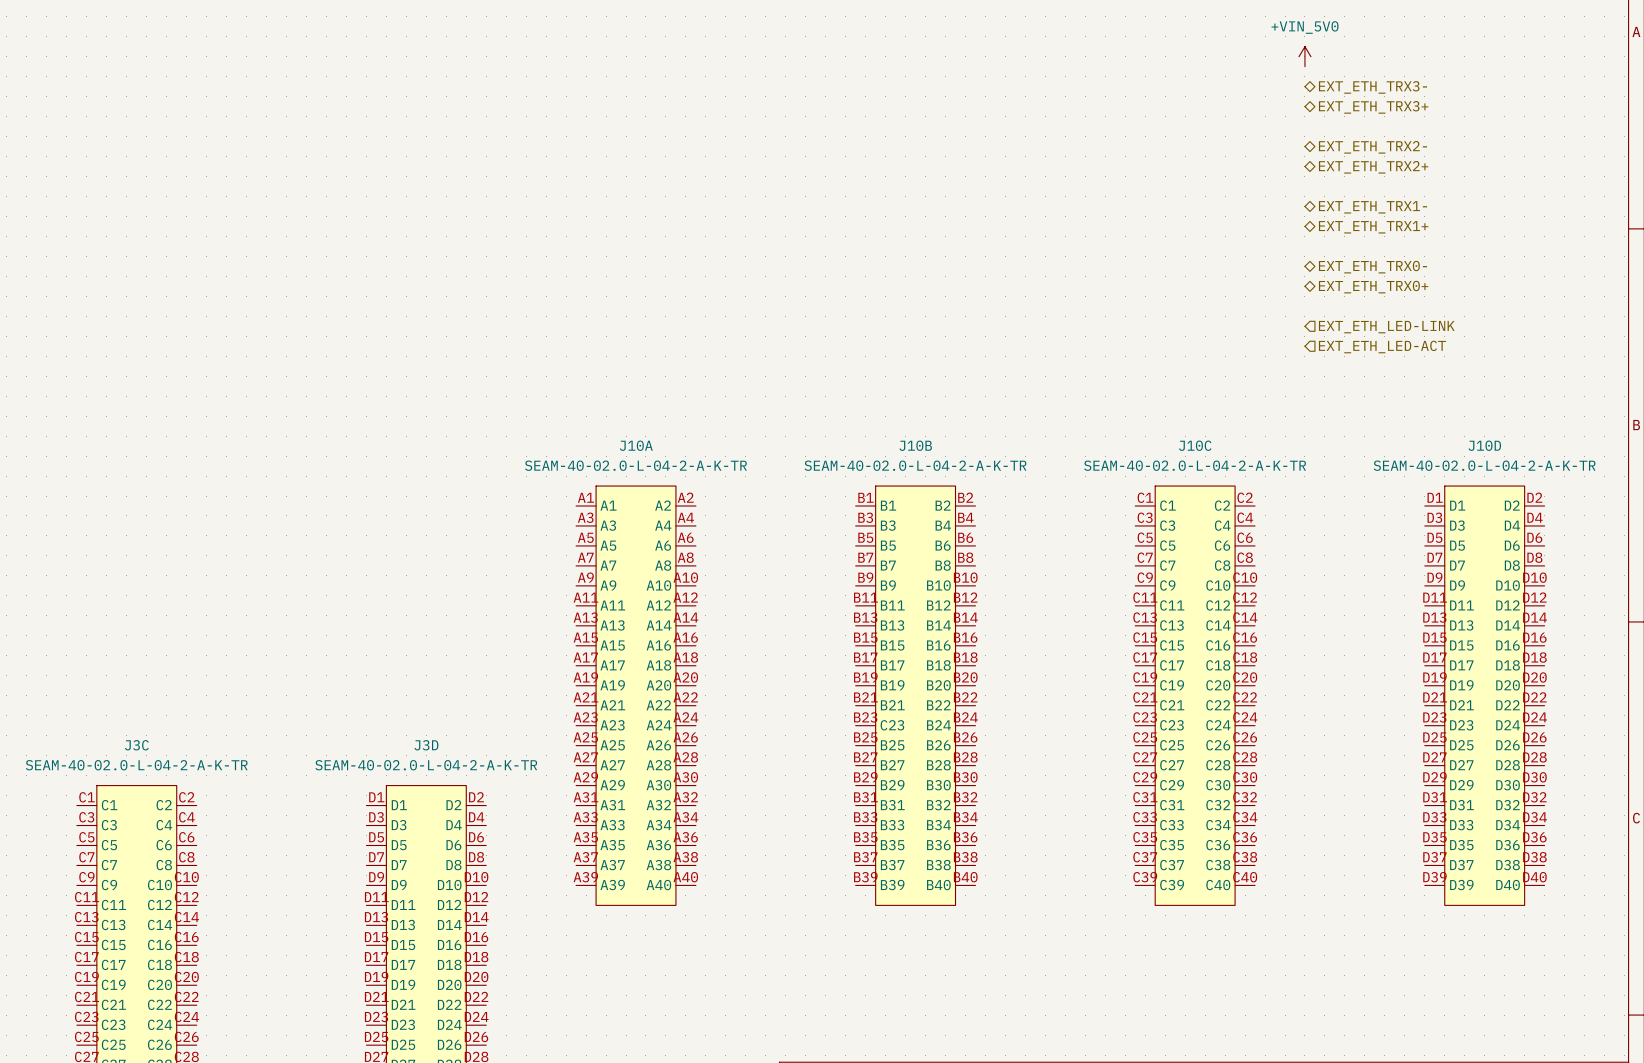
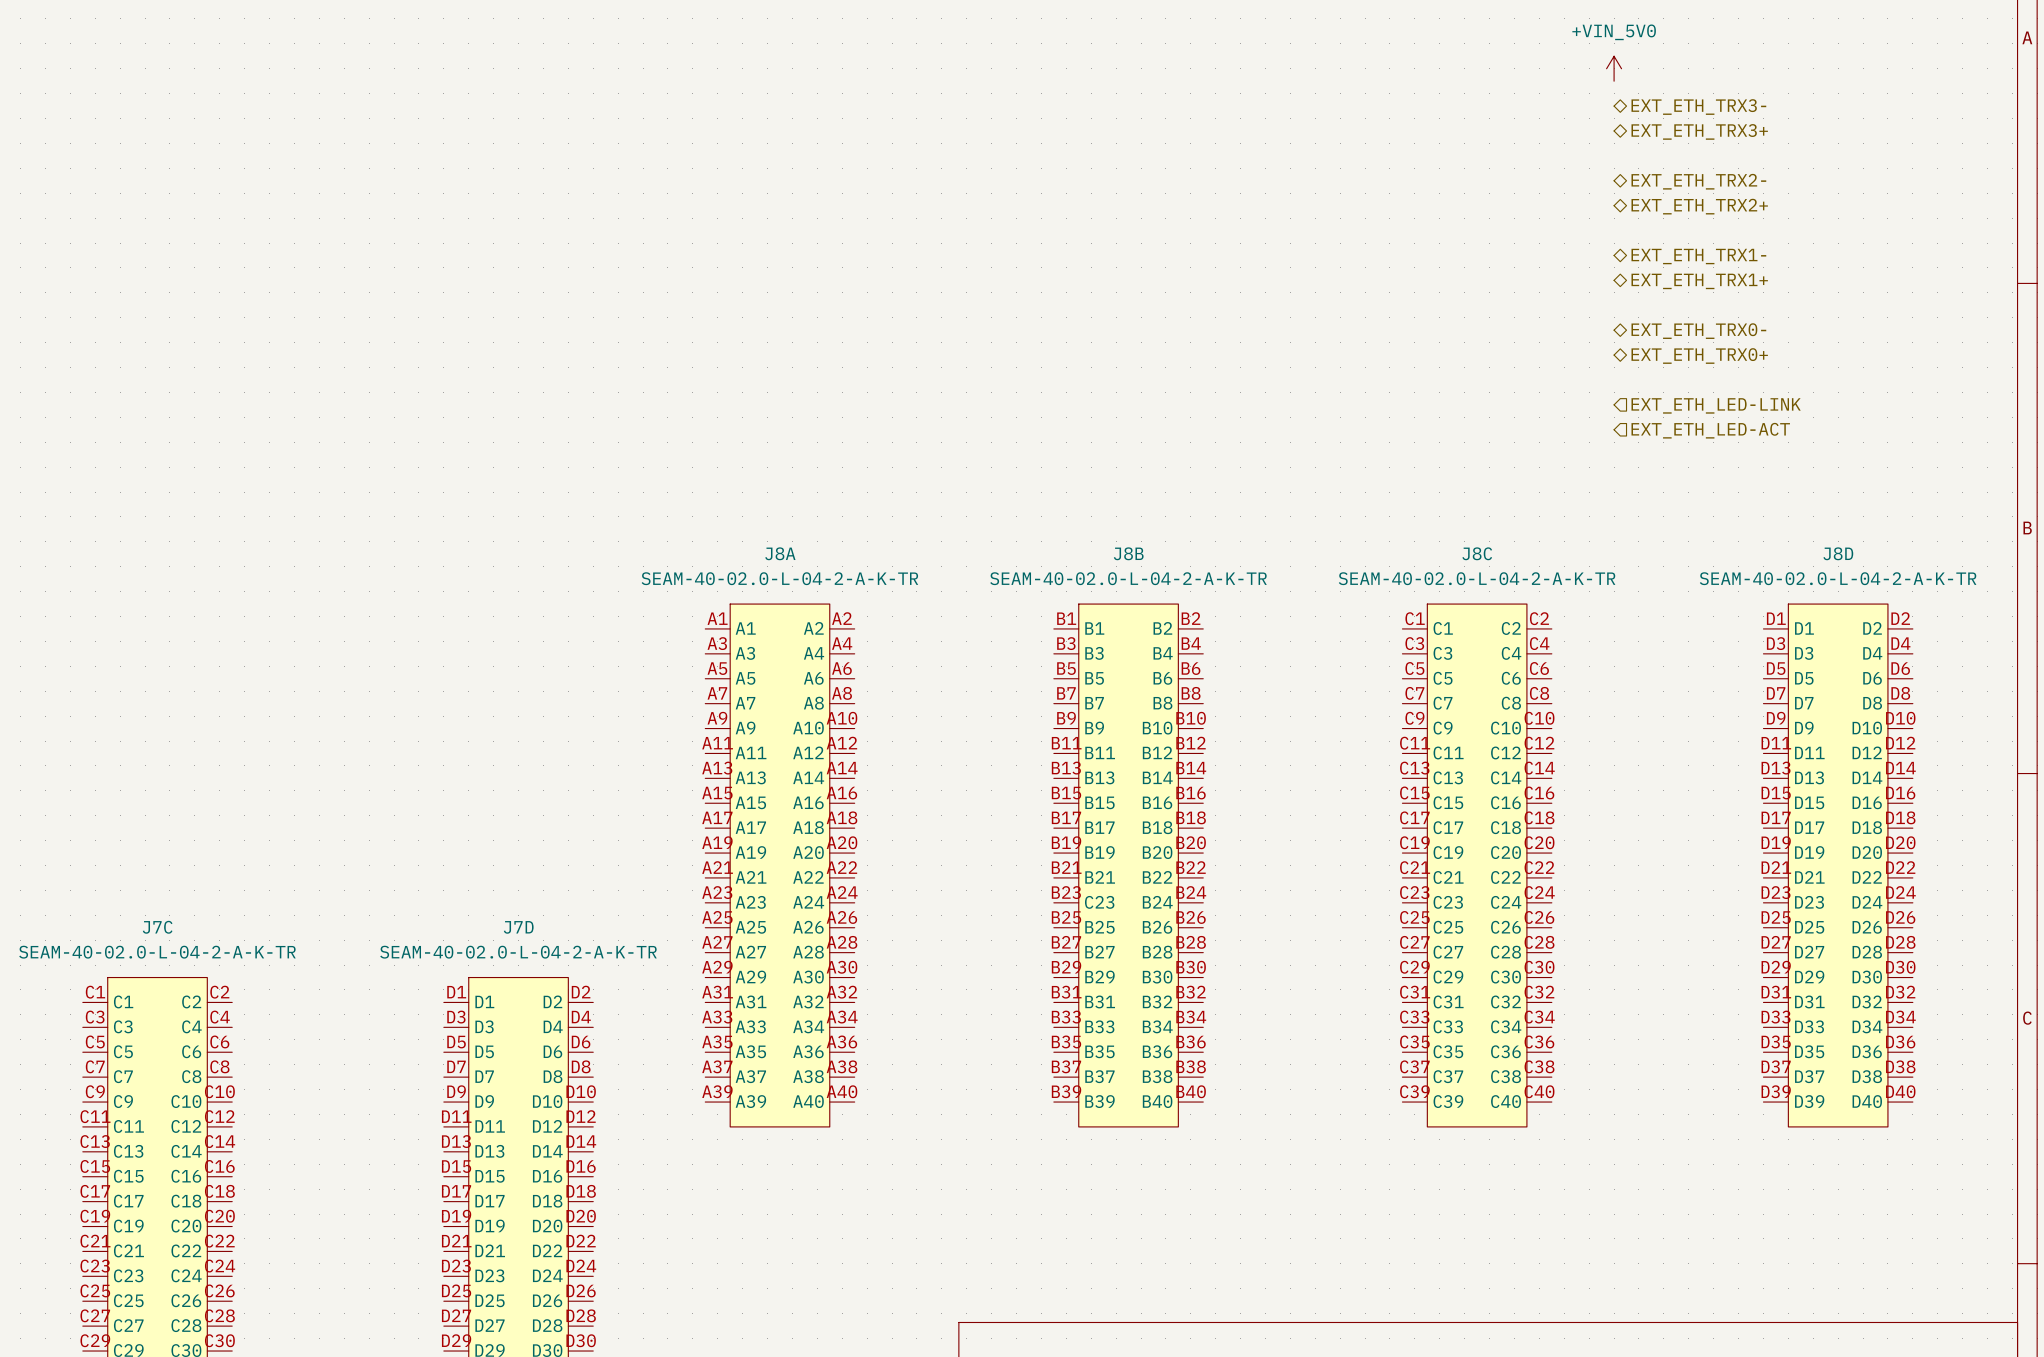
J10A name: J10A (636, 445) -> J8A (780, 553)
J10B name: J10B (915, 445) -> J8B (1128, 553)
J10C name: J10C (1195, 445) -> J8C (1477, 553)
J10D name: J10D (1484, 445) -> J8D (1838, 553)
J3C name: J3C (136, 745) -> J7C (157, 927)
J3D name: J3D (426, 745) -> J7D (518, 927)

